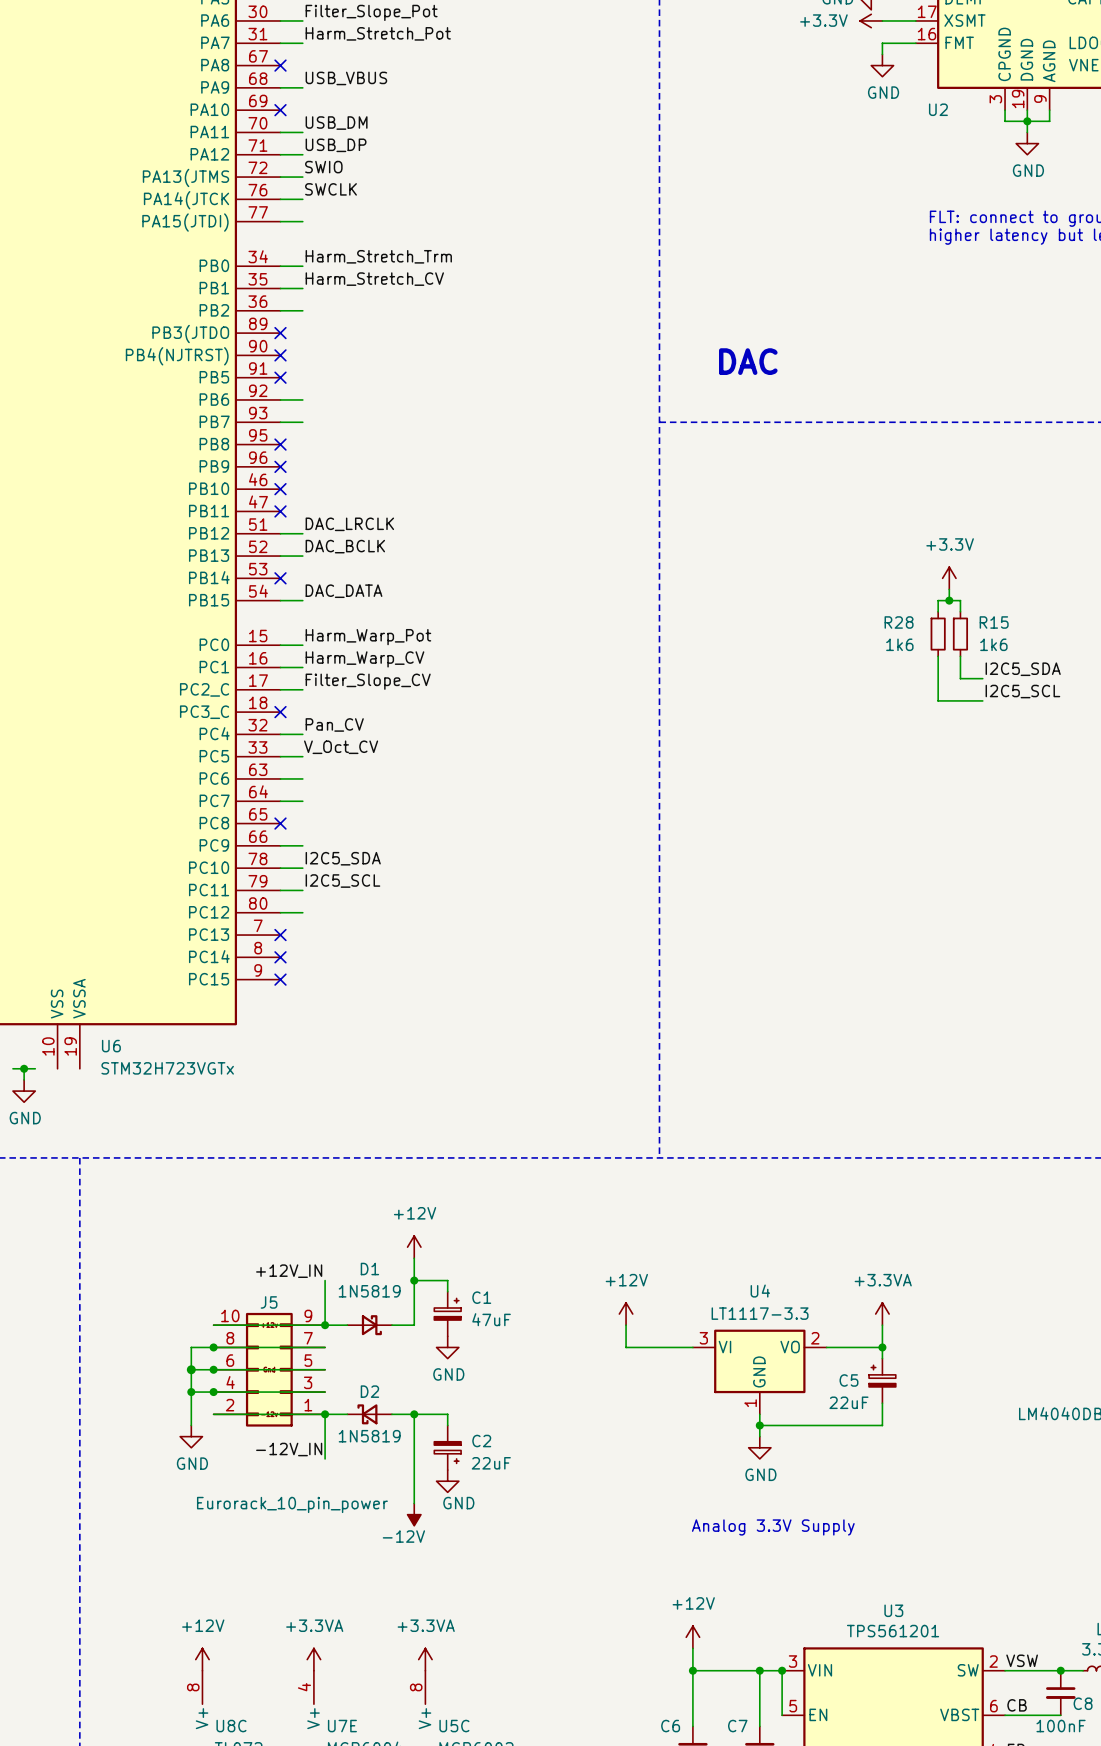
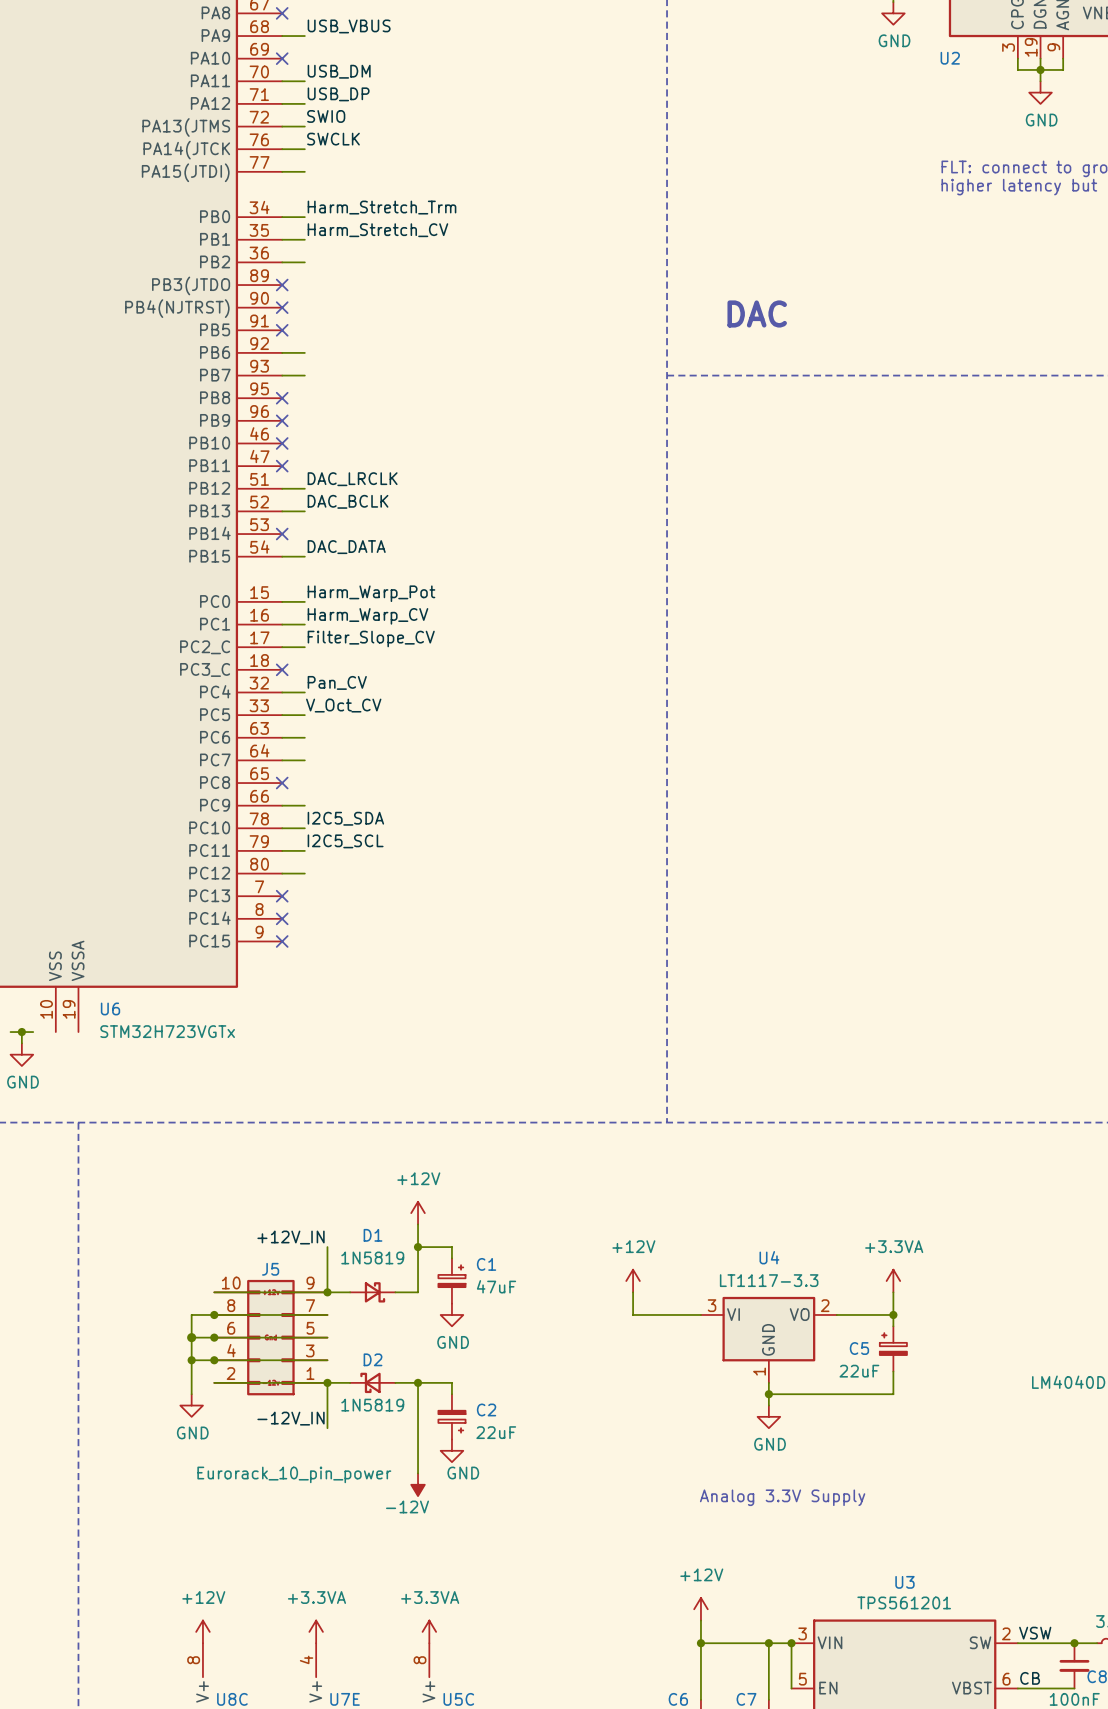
power symbol: +3.3V (949, 578) -> none
wire: (949, 589) (949, 600) -> none
junction: (949, 600) -> none
wire: (938, 611) (938, 600) (960, 600) (960, 611) -> none
R28: 1k6 (938, 634) -> none
R15: 1k6 (960, 634) -> none
wire: (938, 656) (938, 700) (982, 700) -> none
wire: (960, 656) (960, 678) (982, 678) -> none
label: I2C5_SDA (1023, 669) -> none
label: I2C5_SCL (1022, 691) -> none

